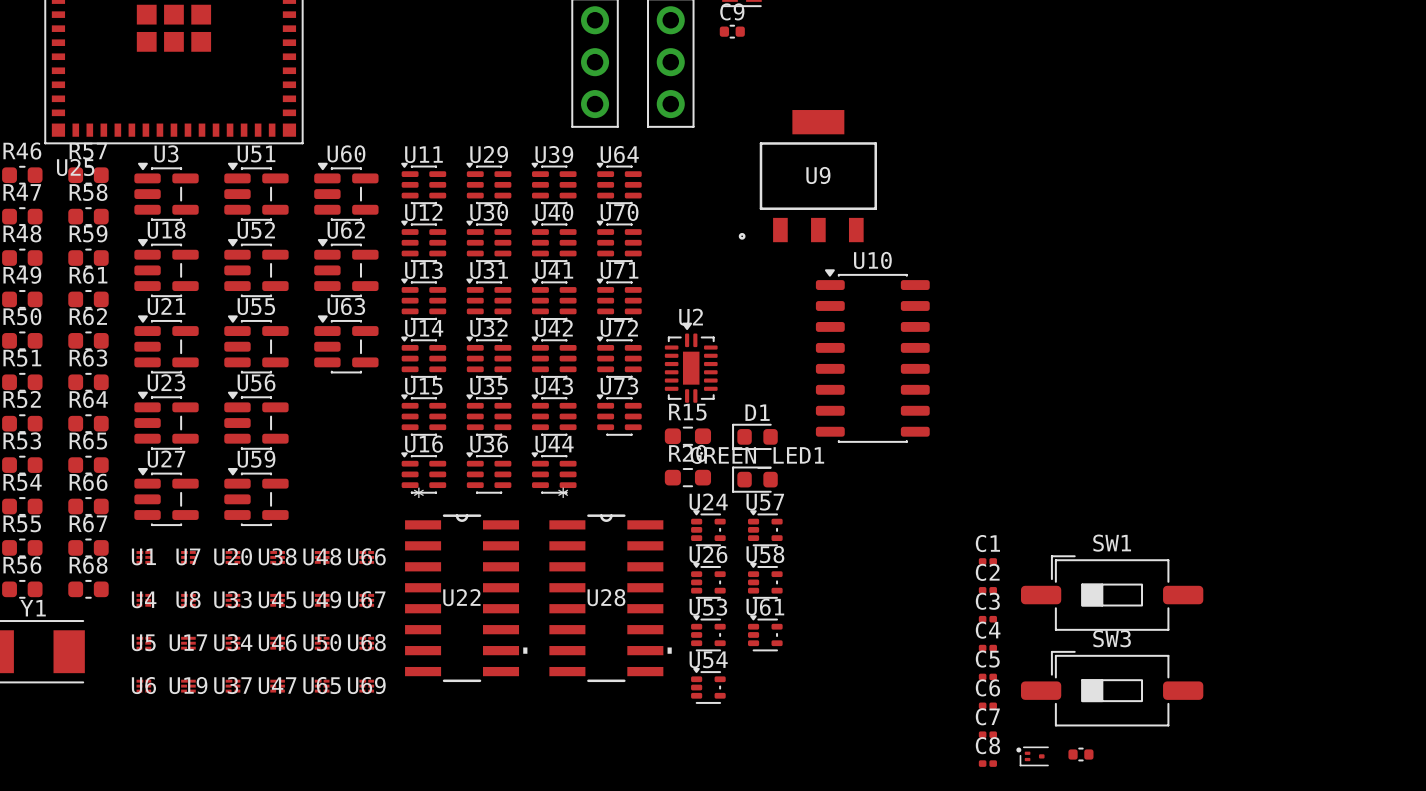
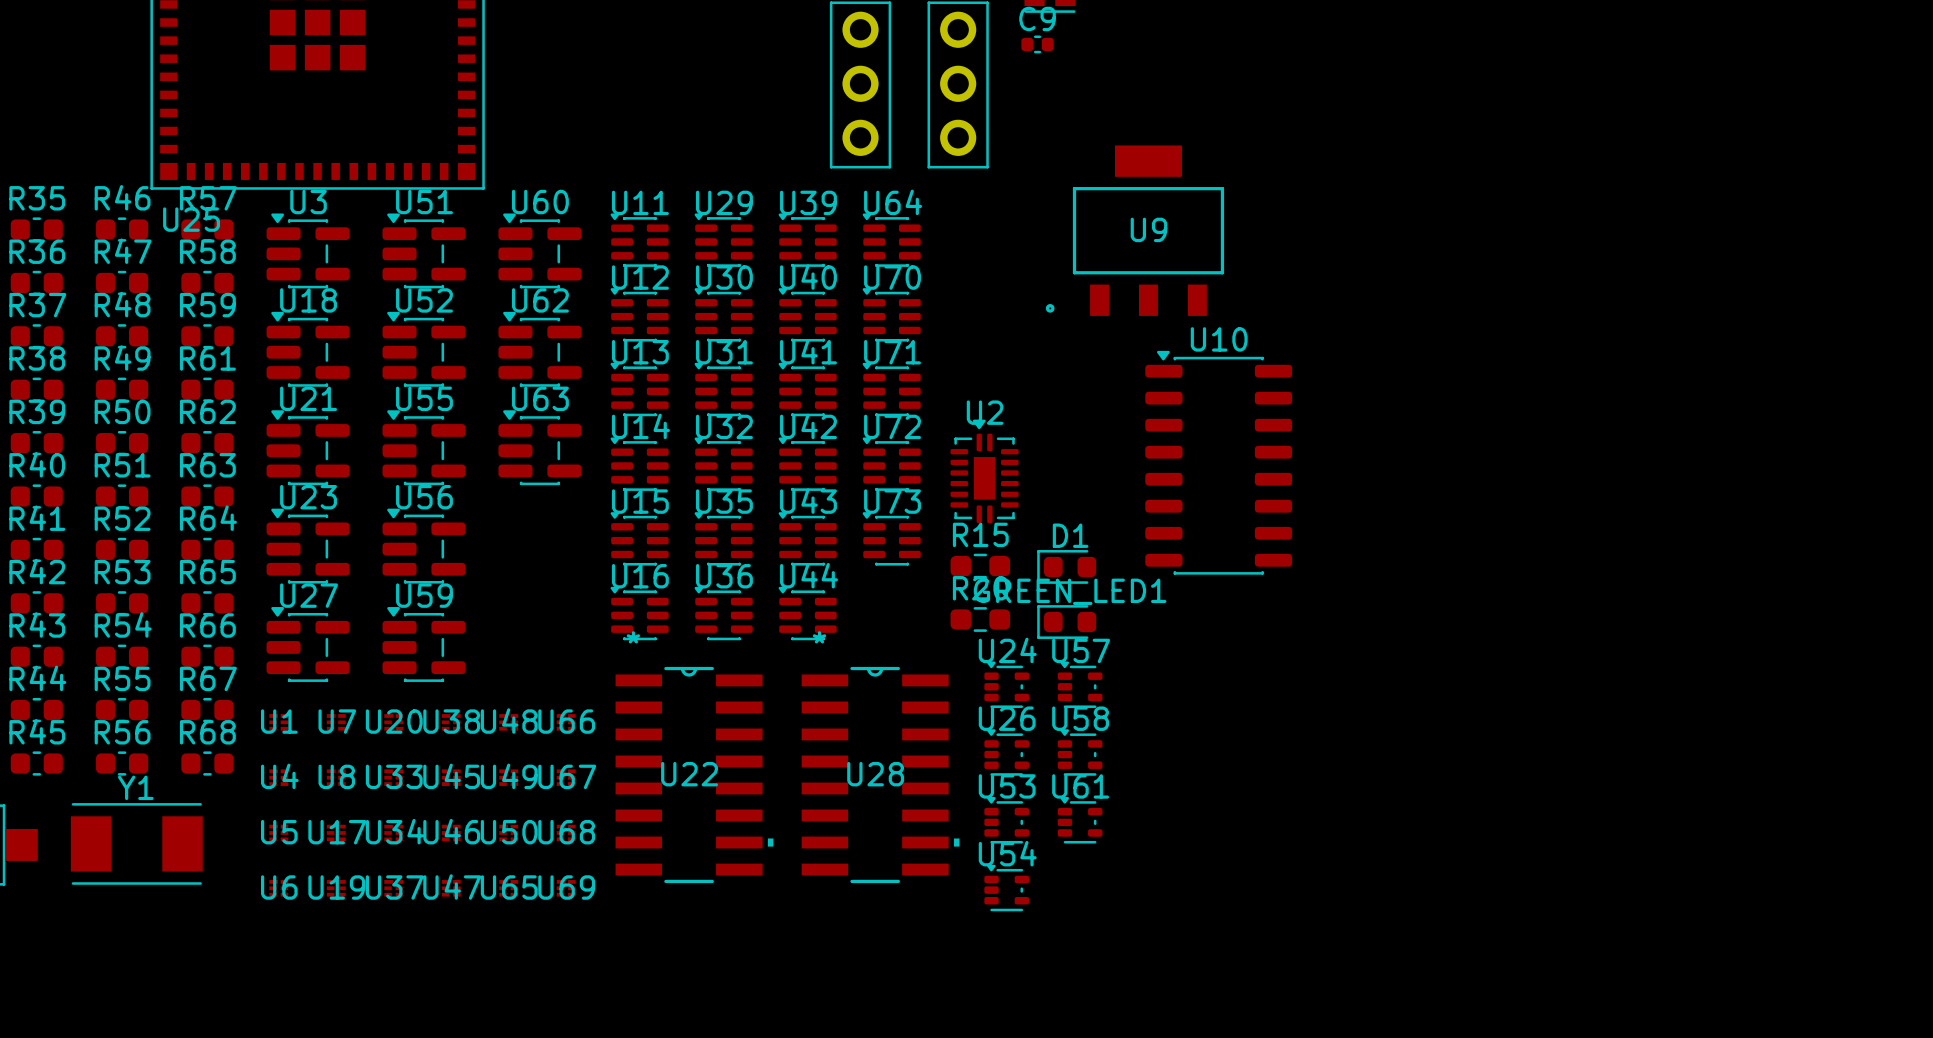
C1: (987, 561) -> none
C2: (987, 590) -> none
SW1: (1112, 593) -> none
C3: (987, 619) -> none
C4: (987, 648) -> none
C5: (987, 676) -> none
SW3: (1112, 688) -> none
C6: (987, 705) -> none
C7: (987, 734) -> none
part: (1080, 754) -> none
part: (1032, 756) -> none
C8: (987, 763) -> none

